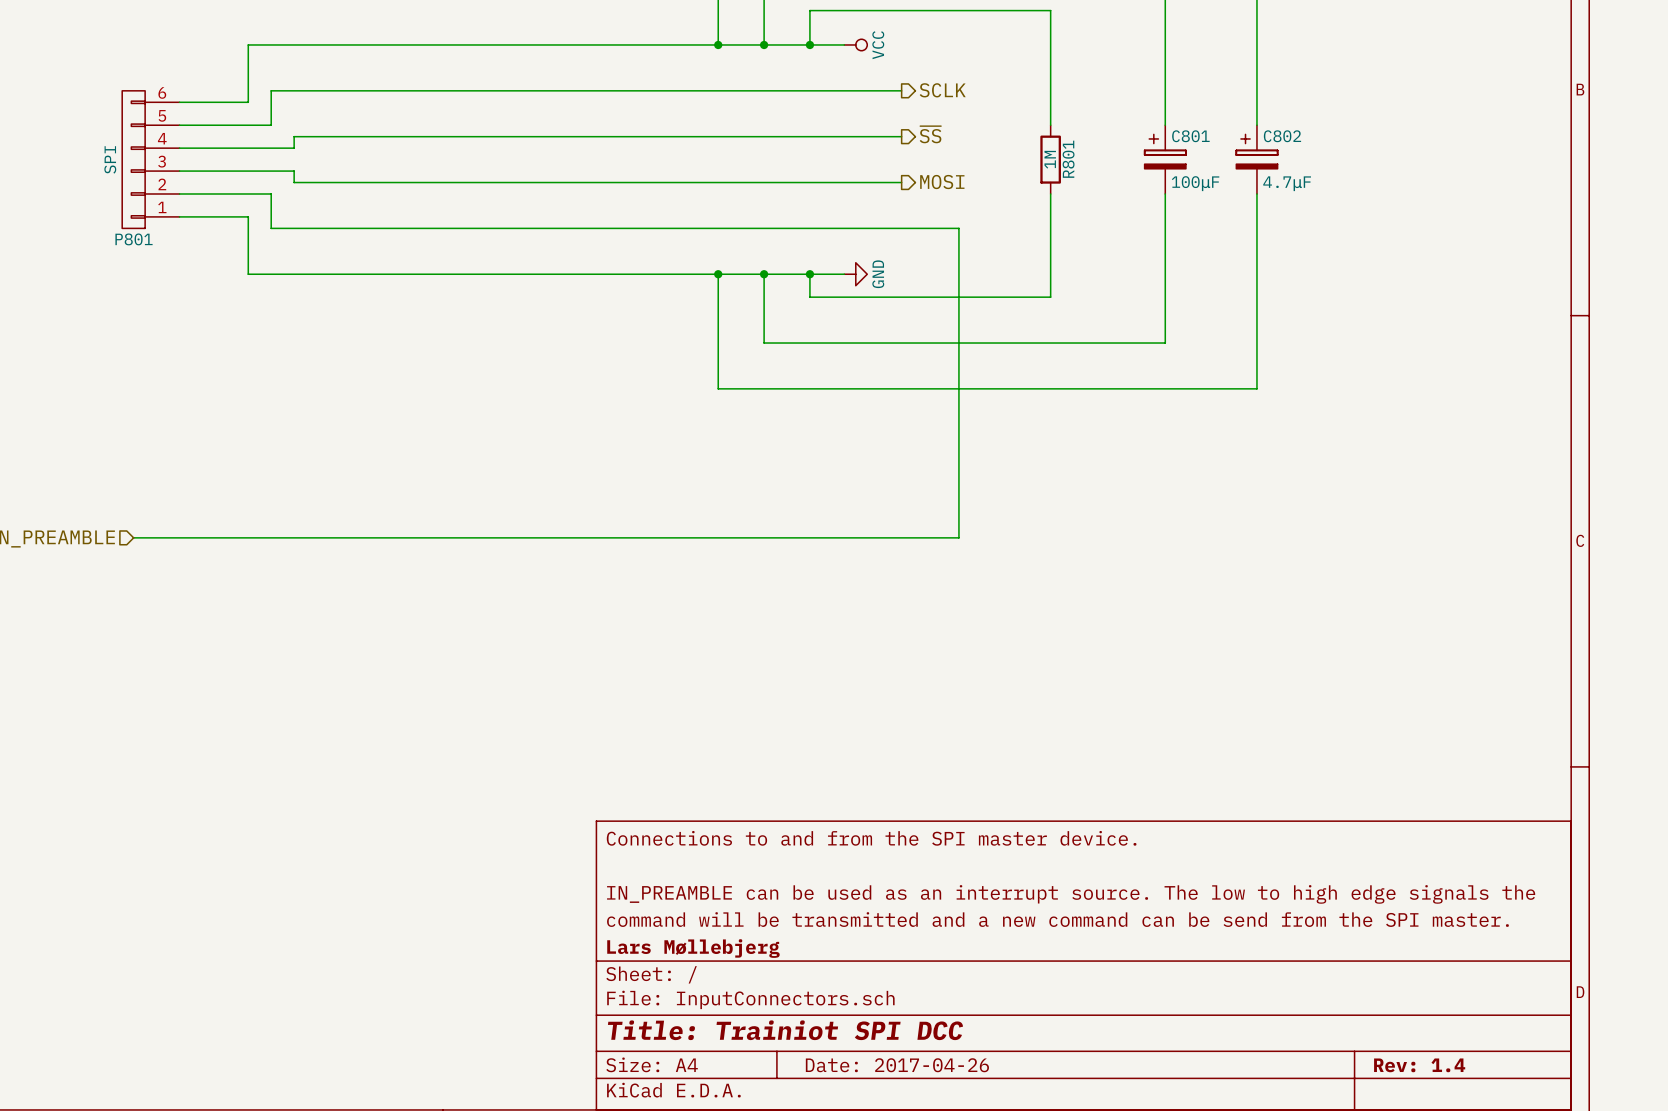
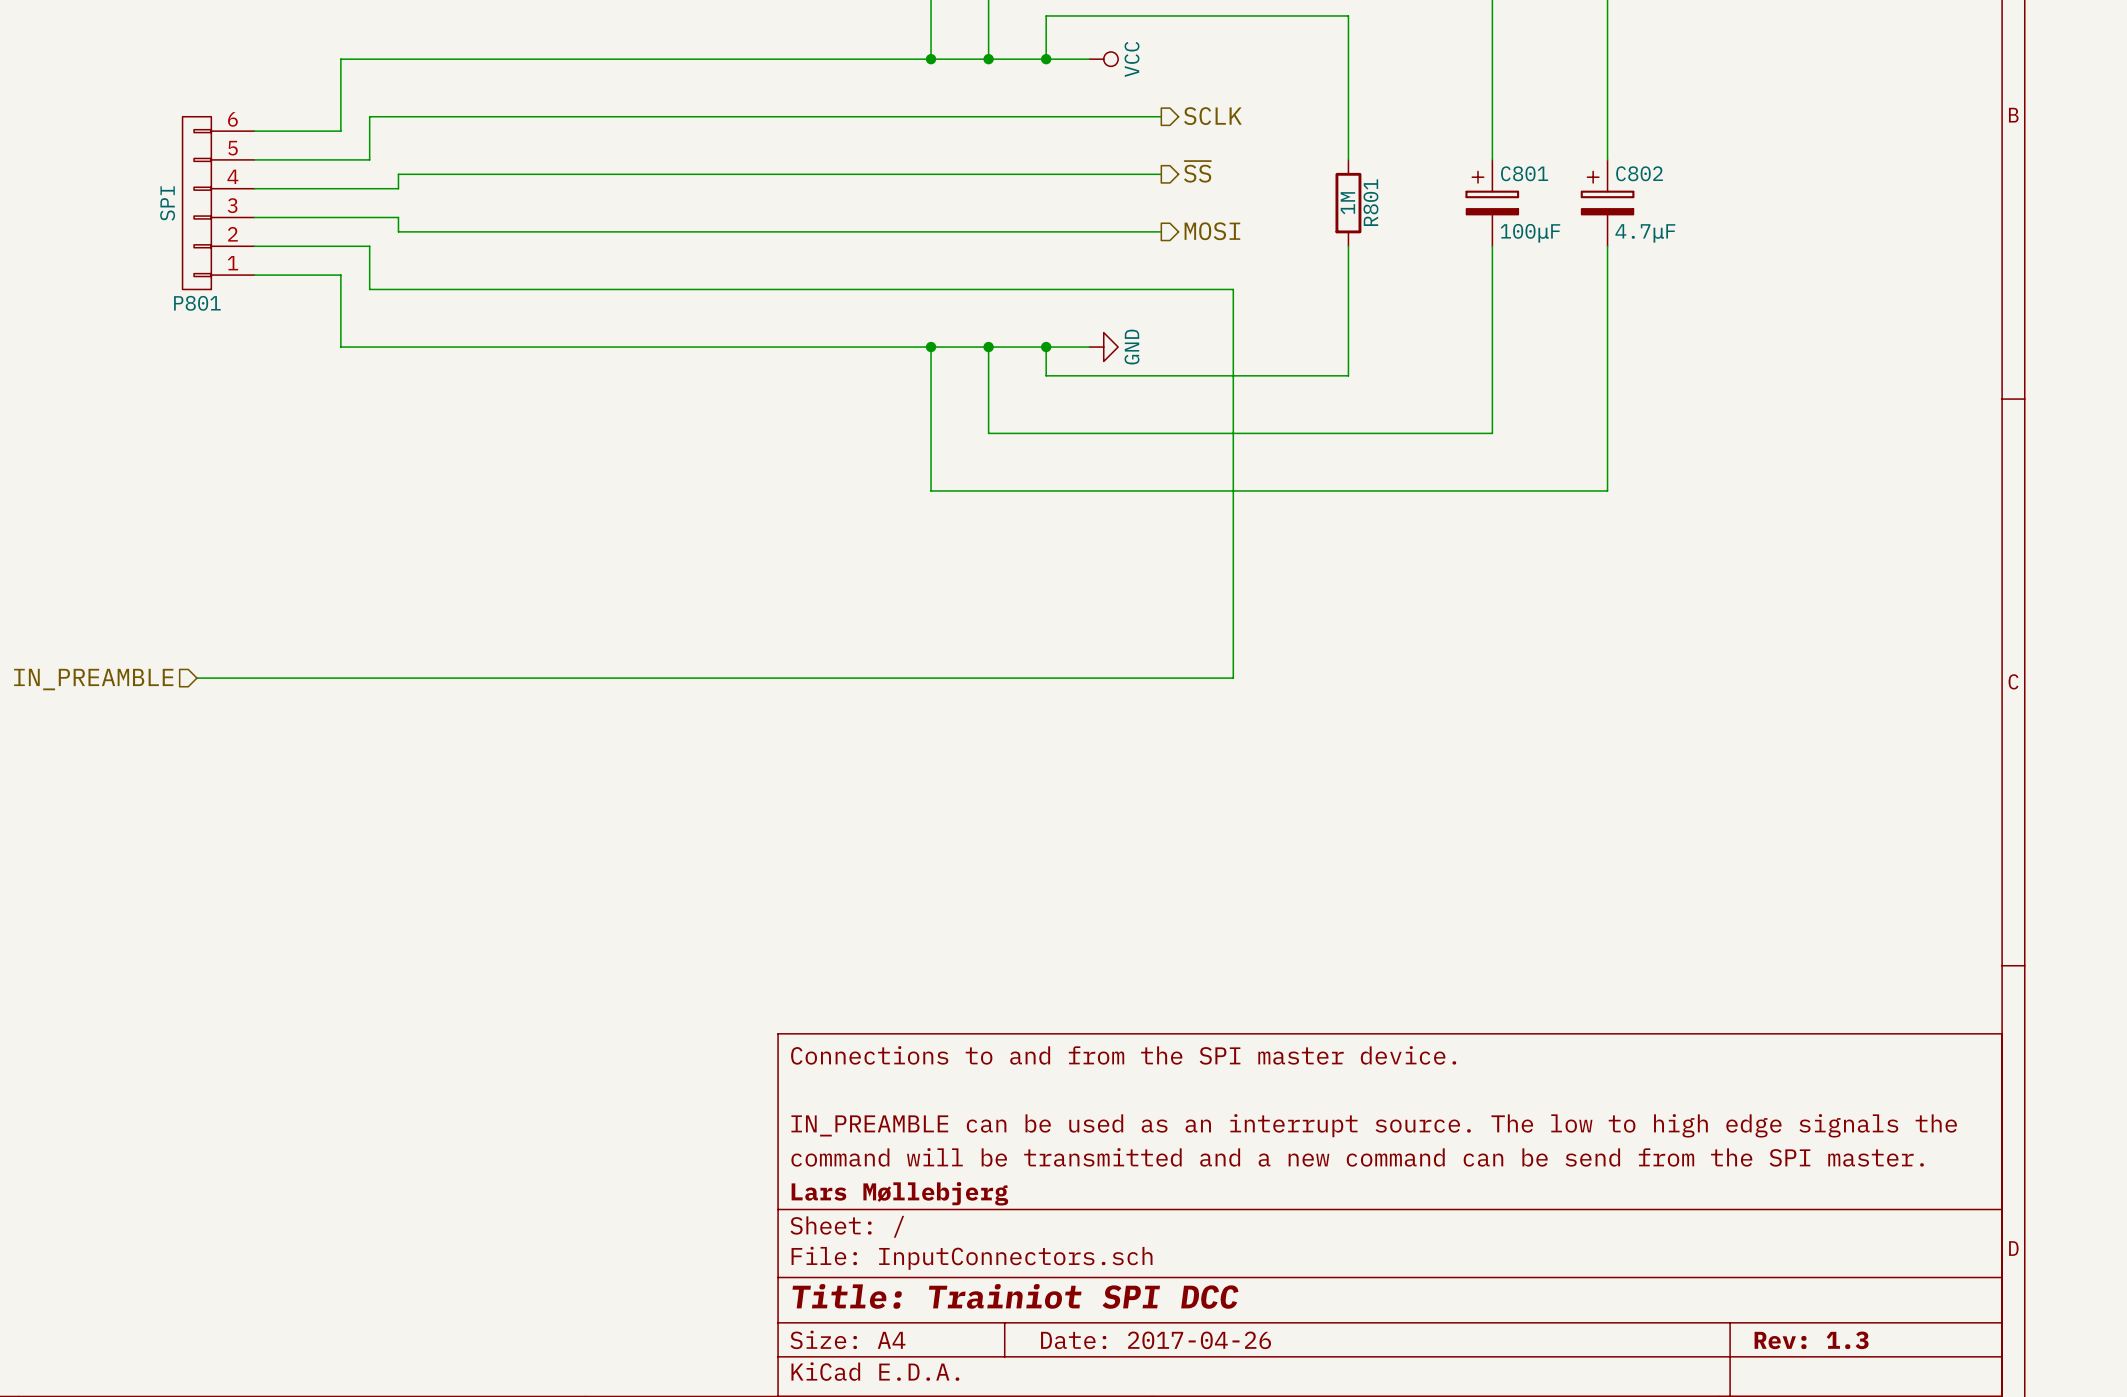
title block: Rev: 1.4 (1419, 1065) -> Rev: 1.3 (1811, 1340)

